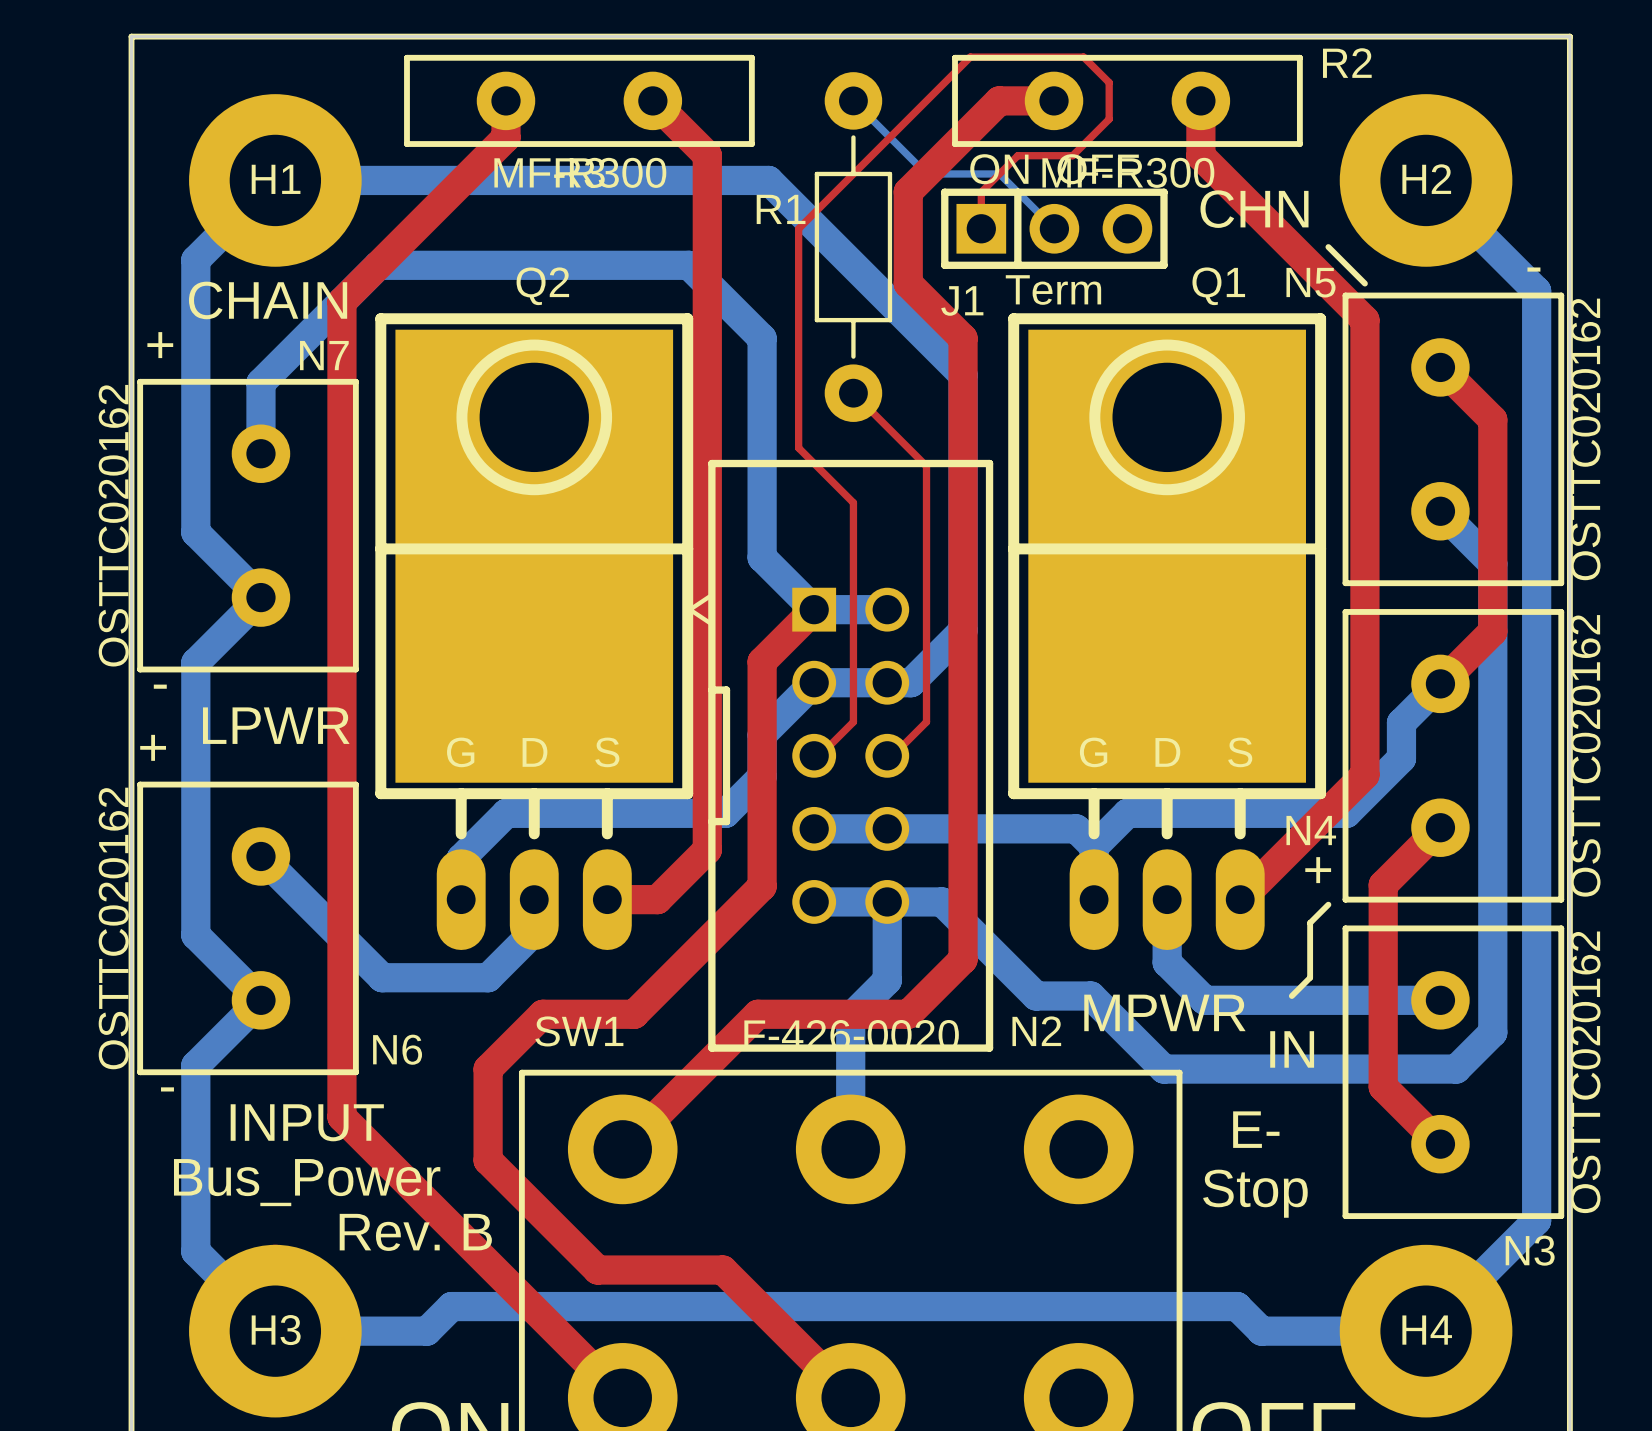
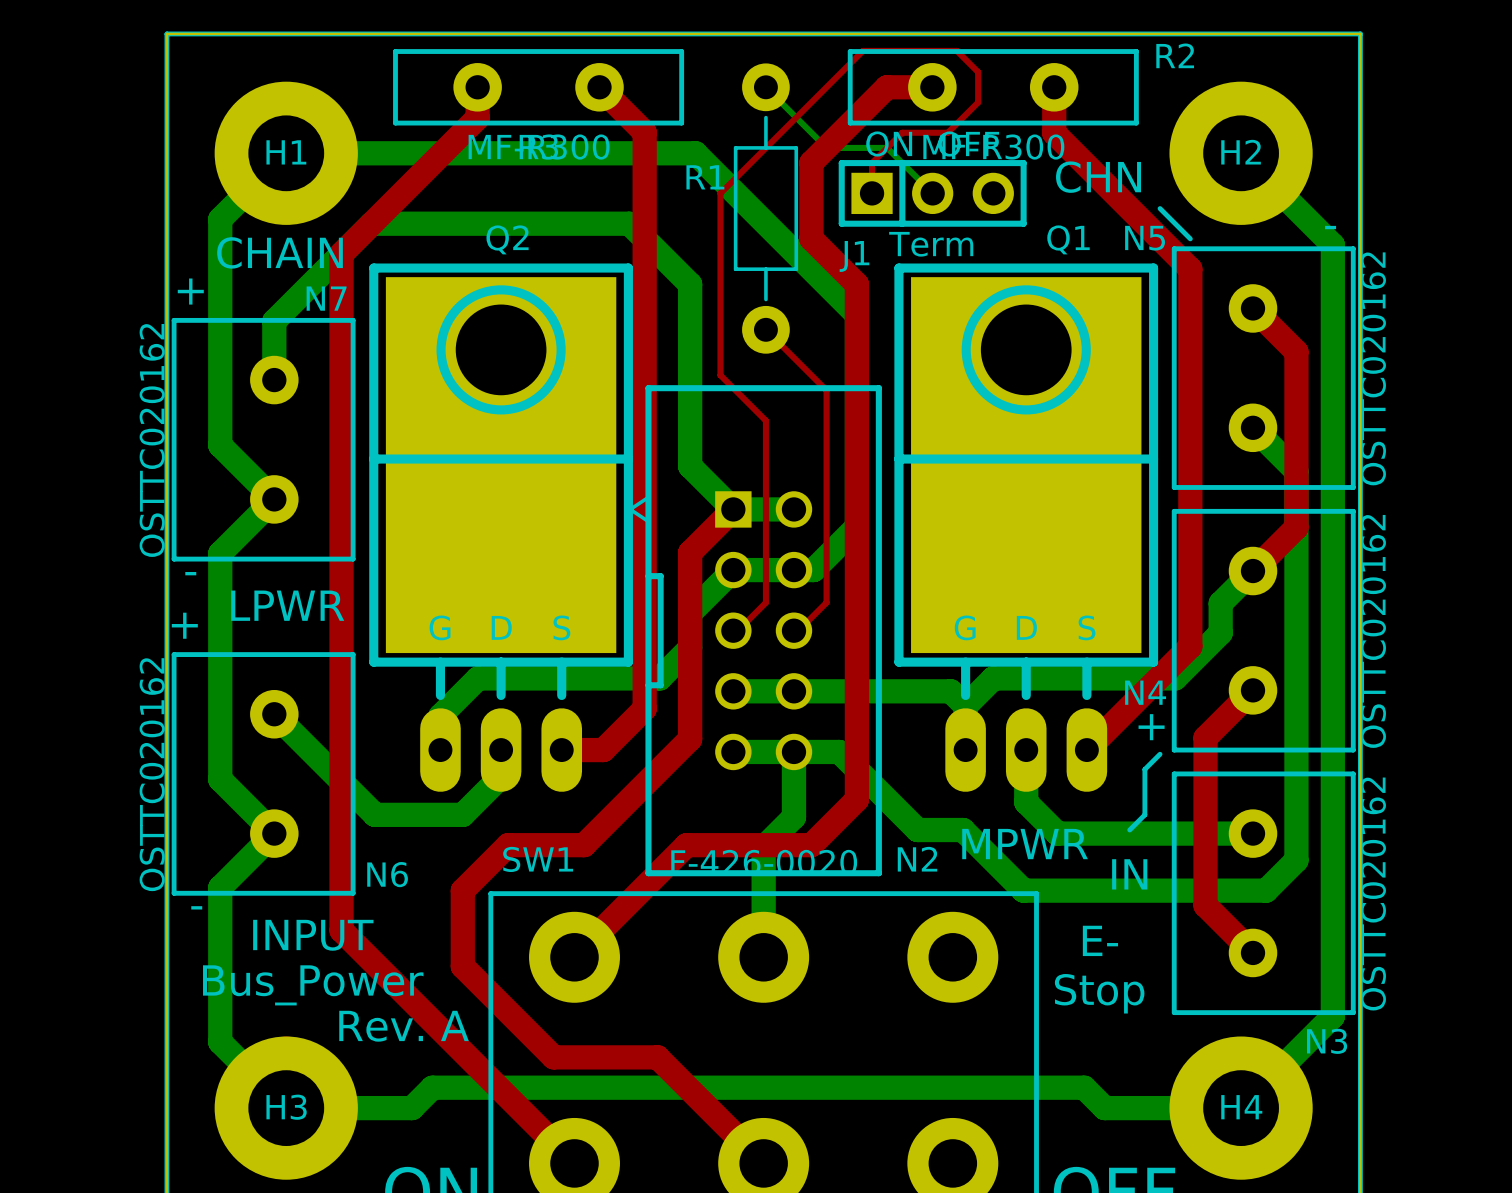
text: Rev. B (415, 1232) -> Rev. A (404, 1026)

